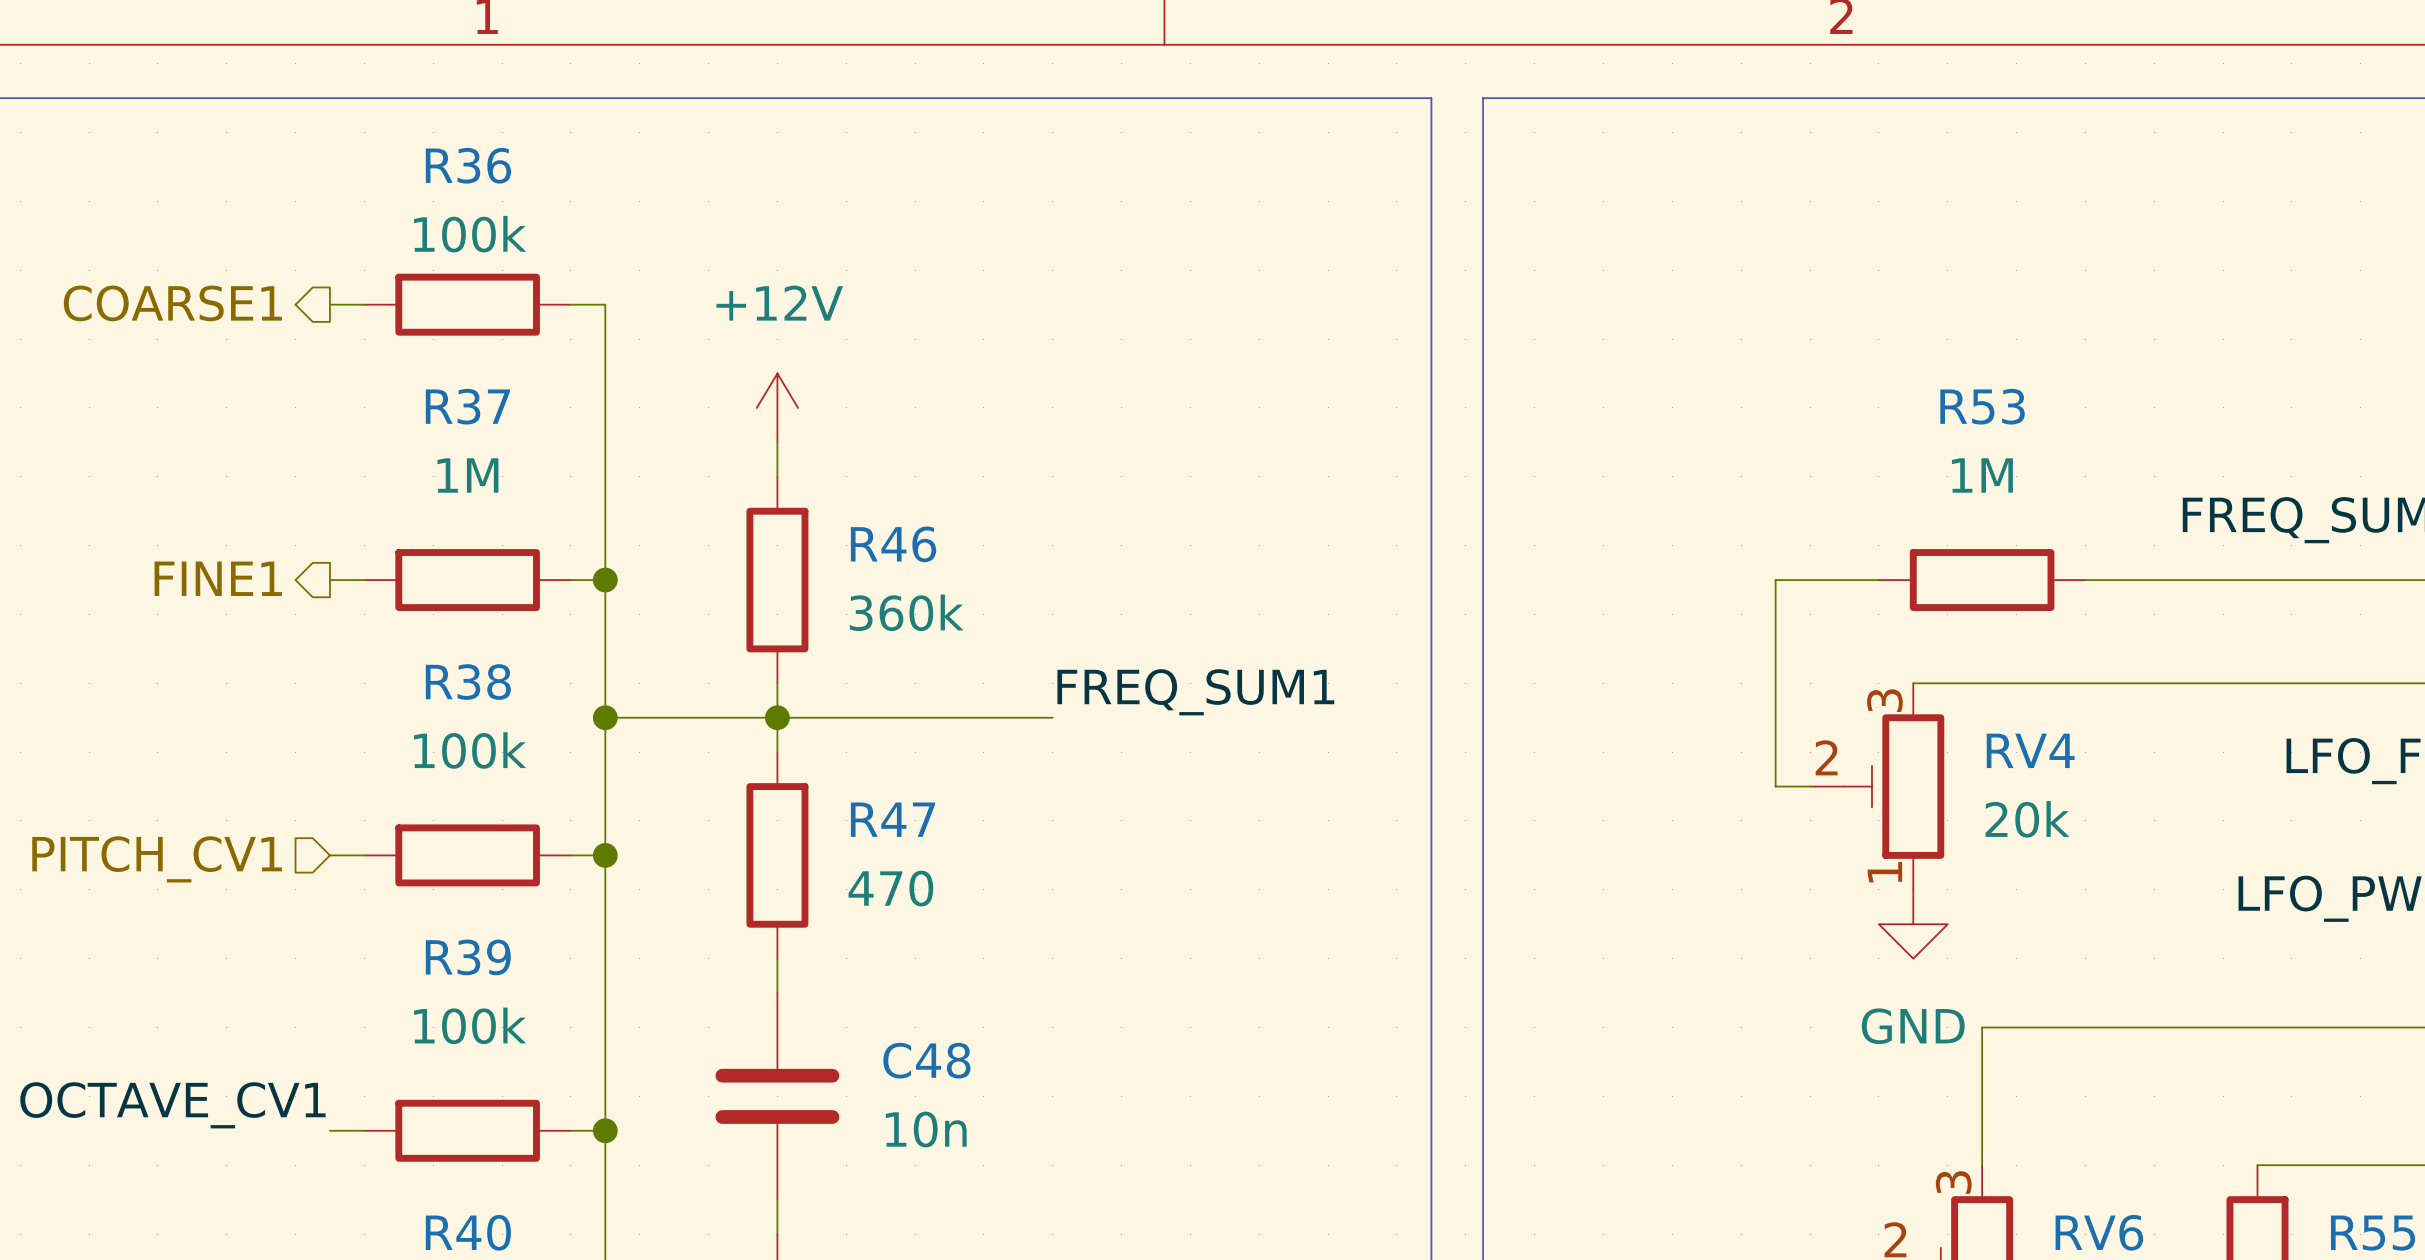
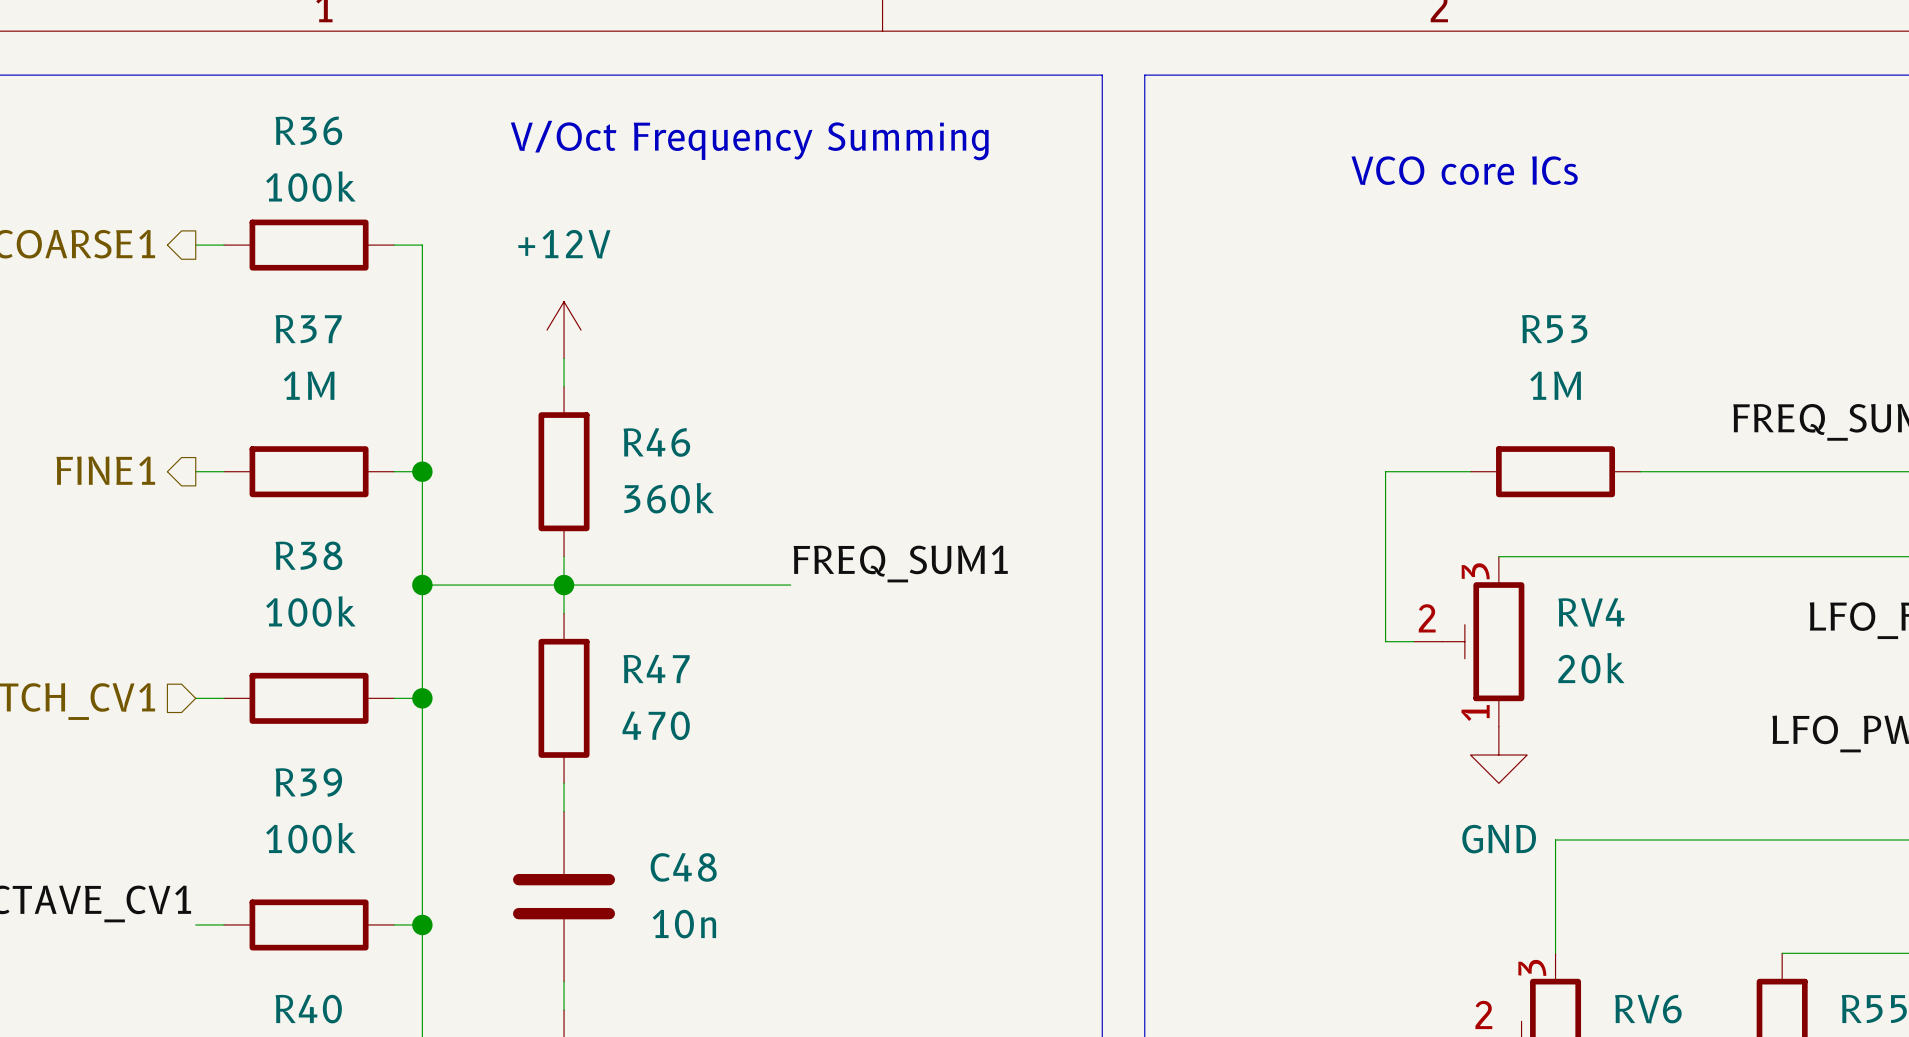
text: none -> V/Oct Frequency Summing (749, 140)
text: none -> VCO core ICs (1464, 170)

